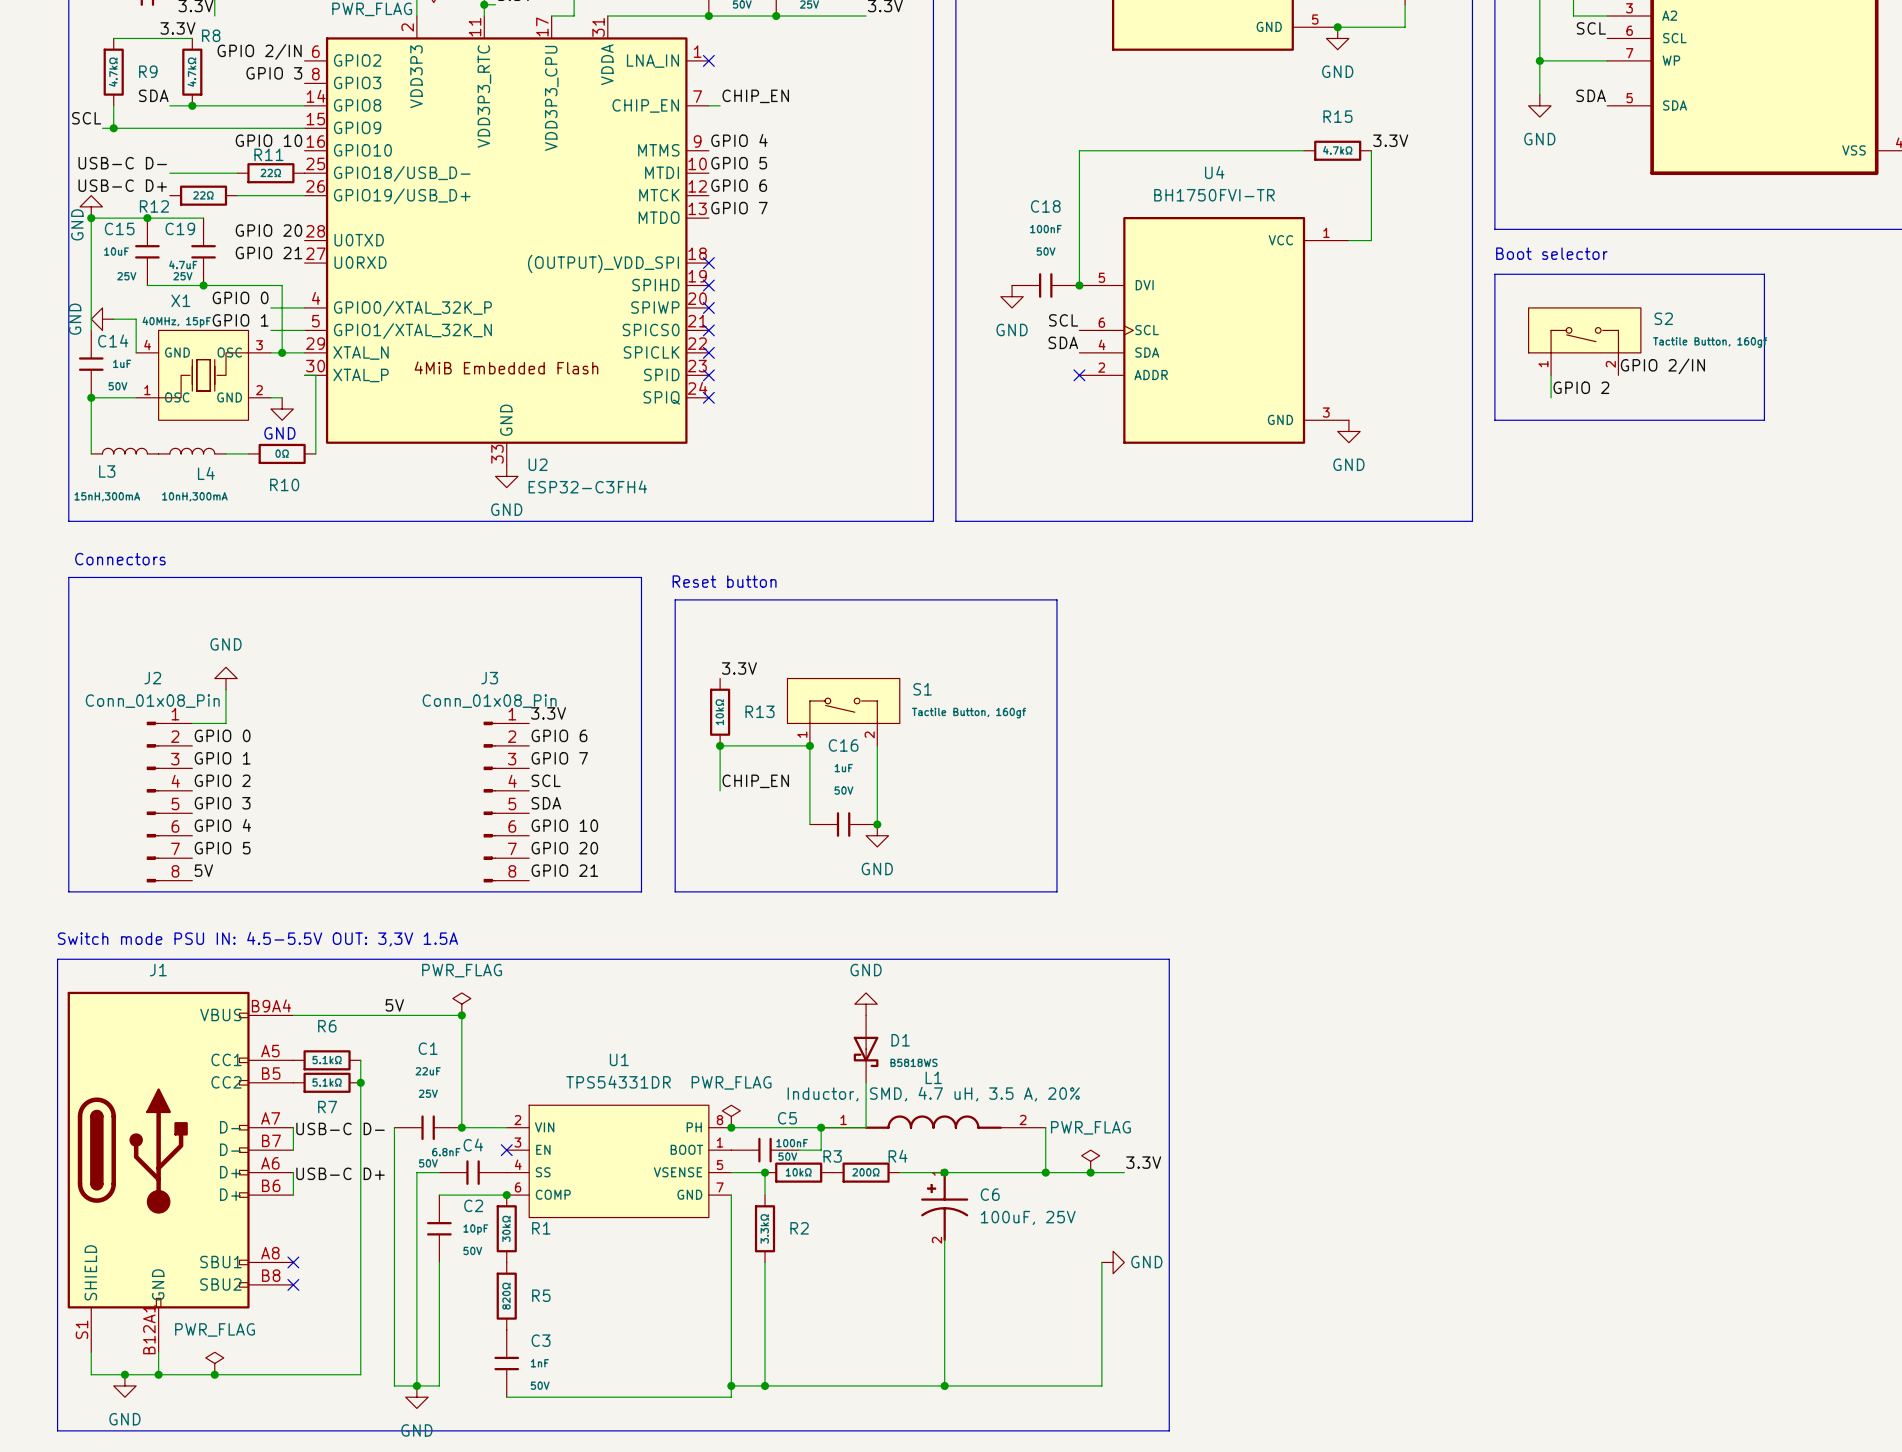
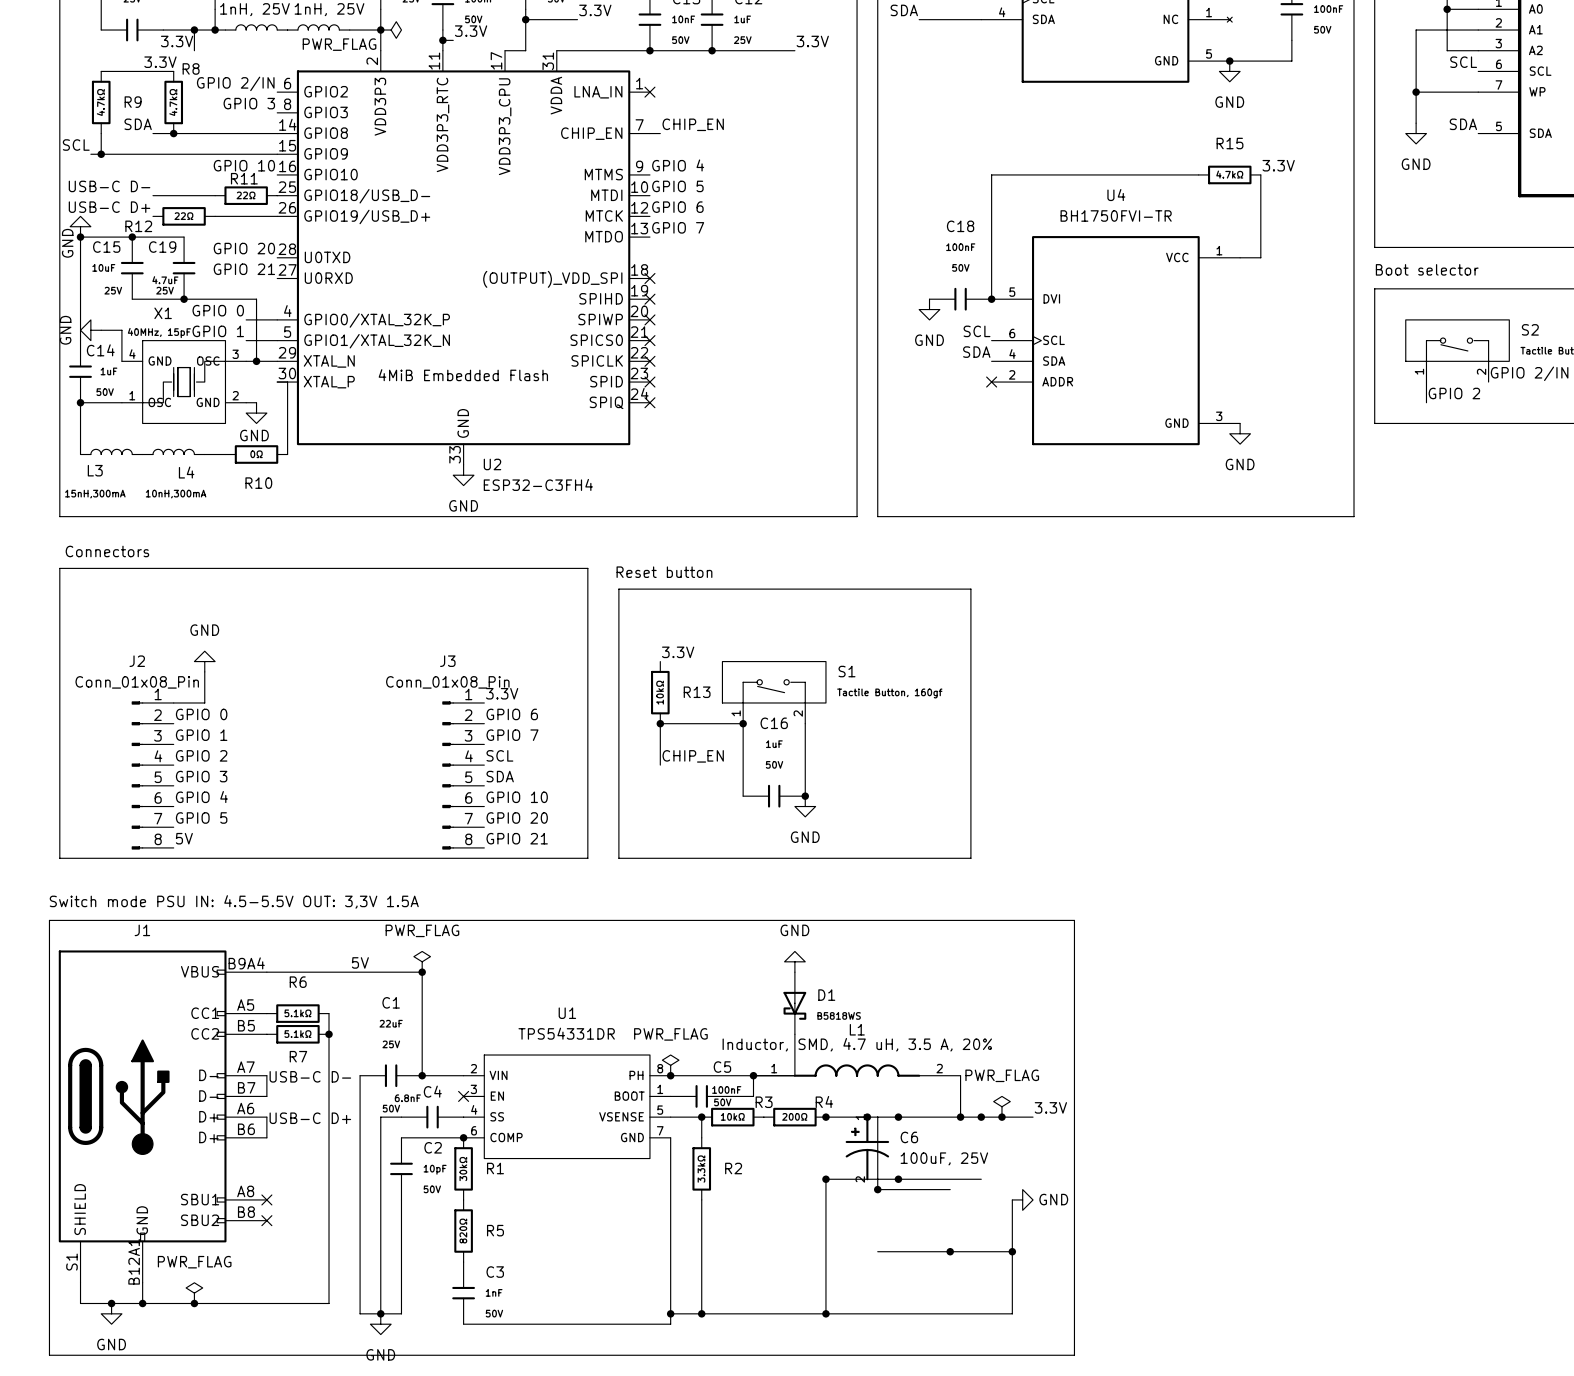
junction: none -> (825, 1117)
wire: none -> (877, 1117) (877, 1189) (950, 1189)
junction: none -> (898, 1117)
junction: none -> (981, 1117)
junction: none -> (825, 1179)
wire: (944, 1239) (944, 1385) -> none
junction: none -> (898, 1179)
wire: none -> (981, 1179) (825, 1179) (825, 1313)
junction: none -> (877, 1189)
wire: none -> (877, 1251) (1012, 1251)
junction: none -> (950, 1251)
junction: none -> (1012, 1251)
junction position: (944, 1385) -> (825, 1313)

